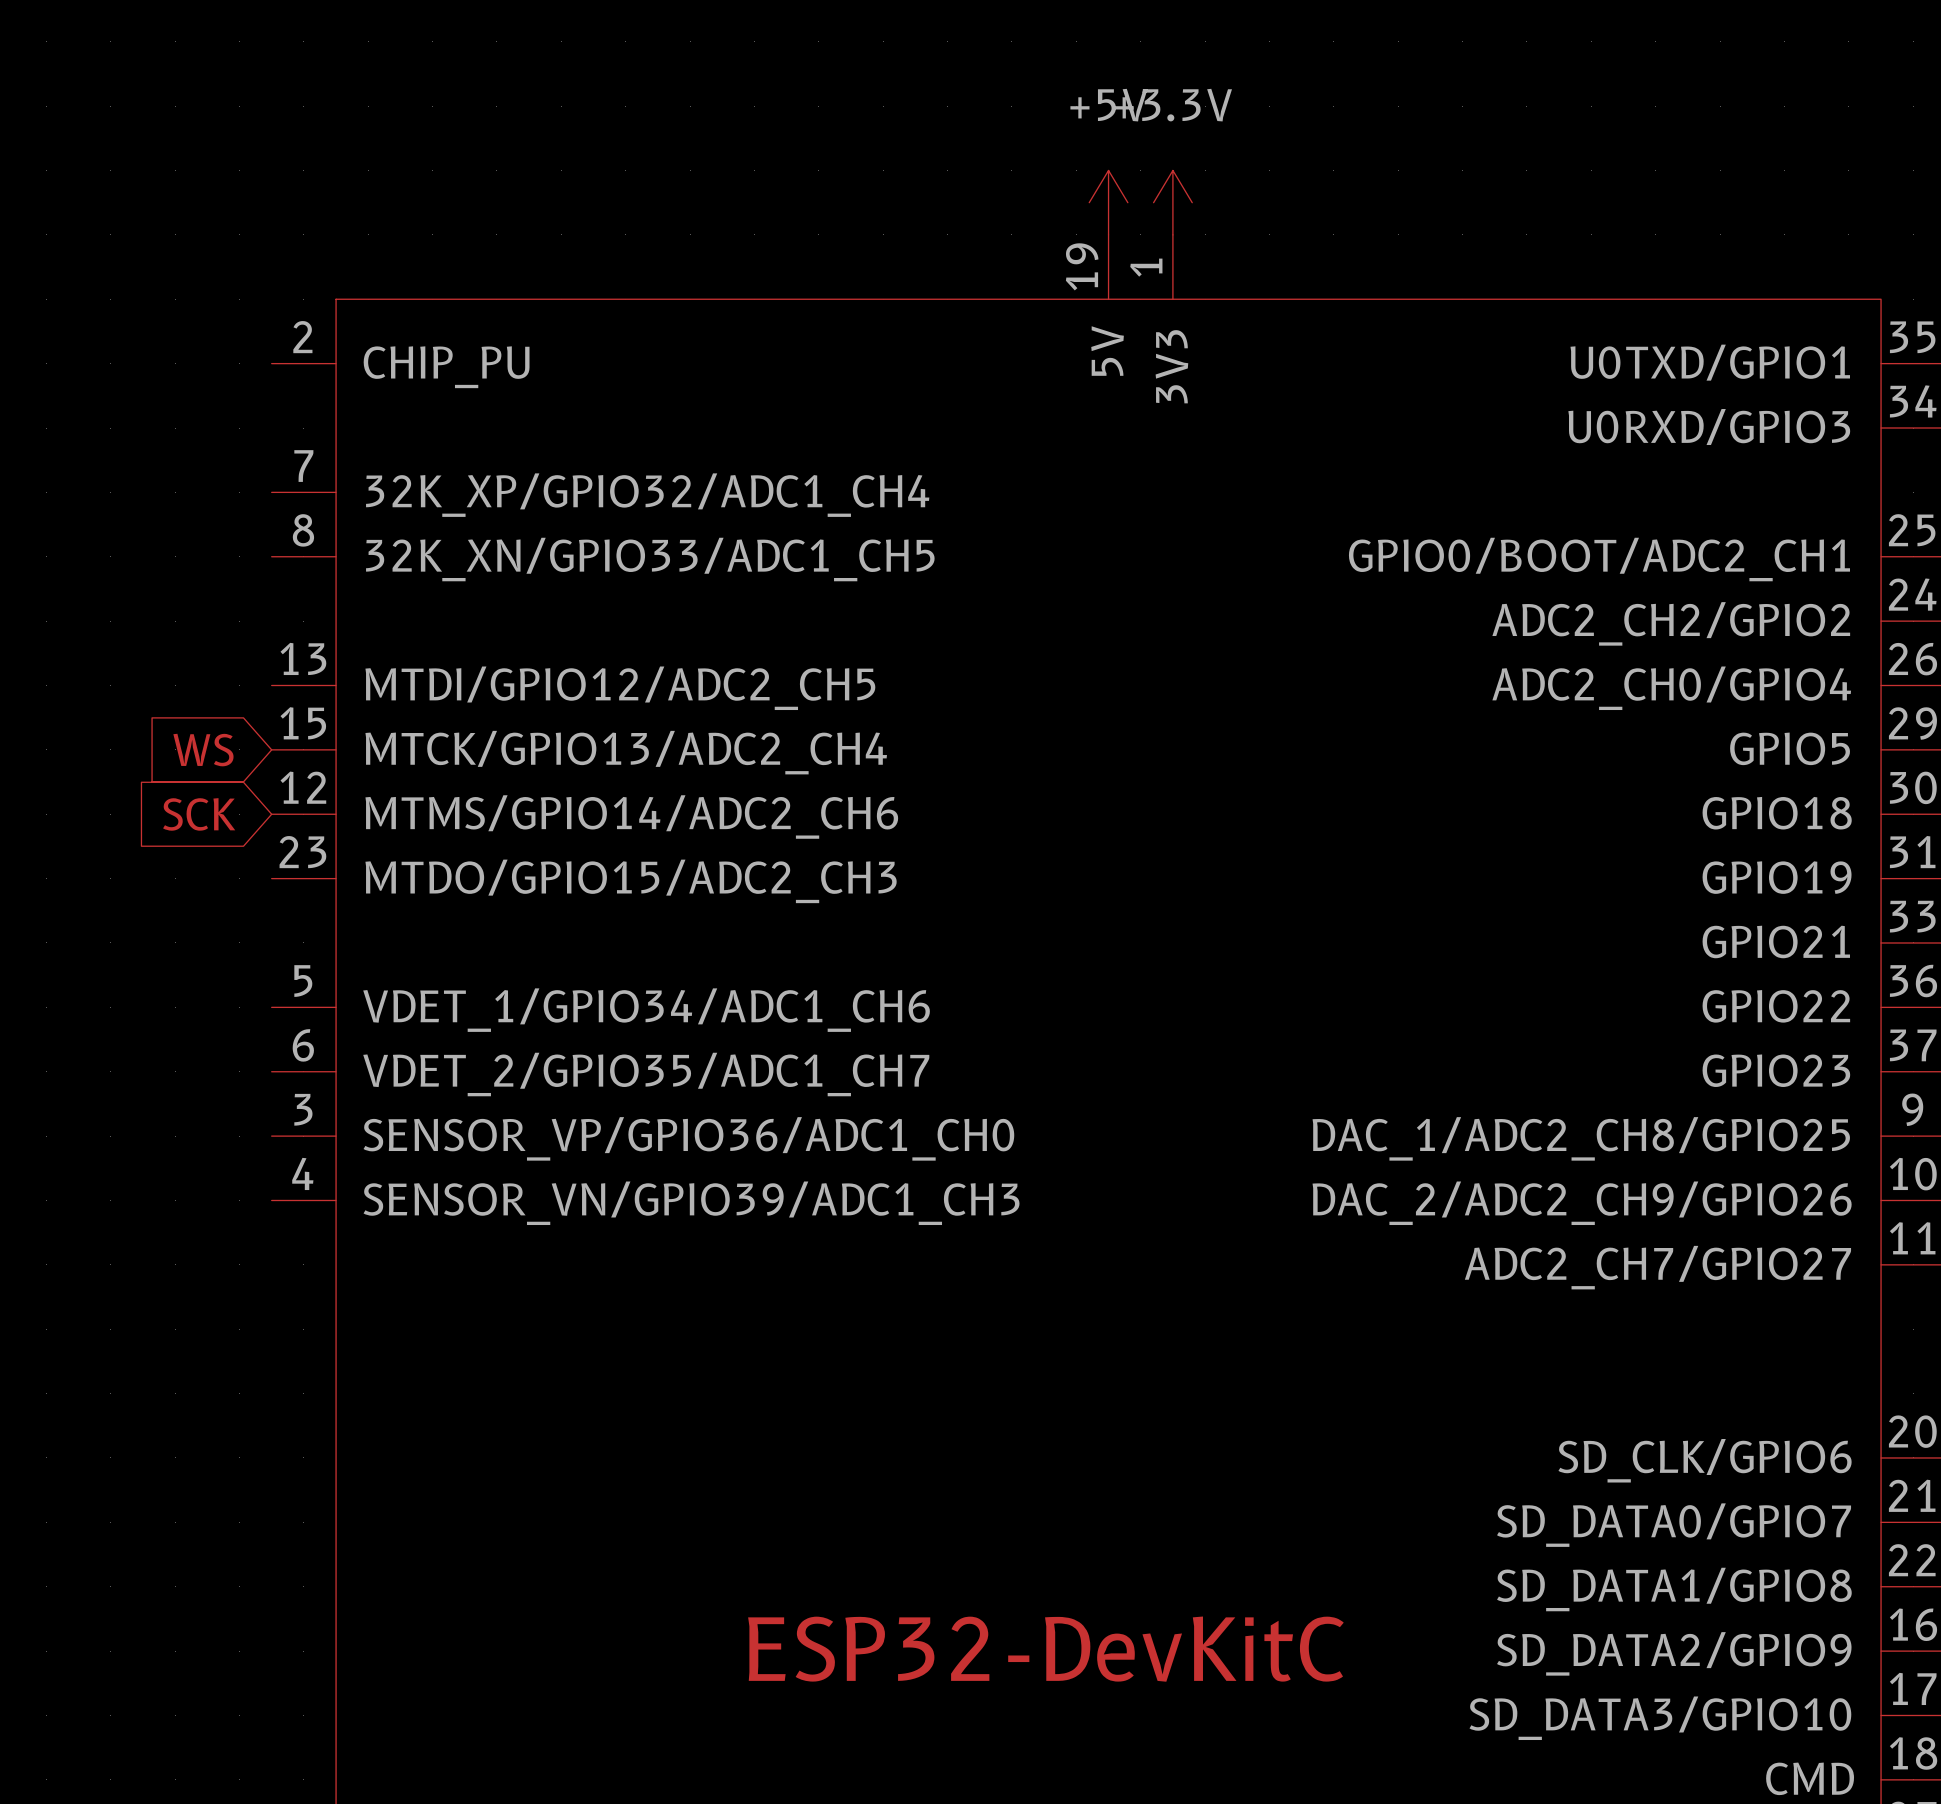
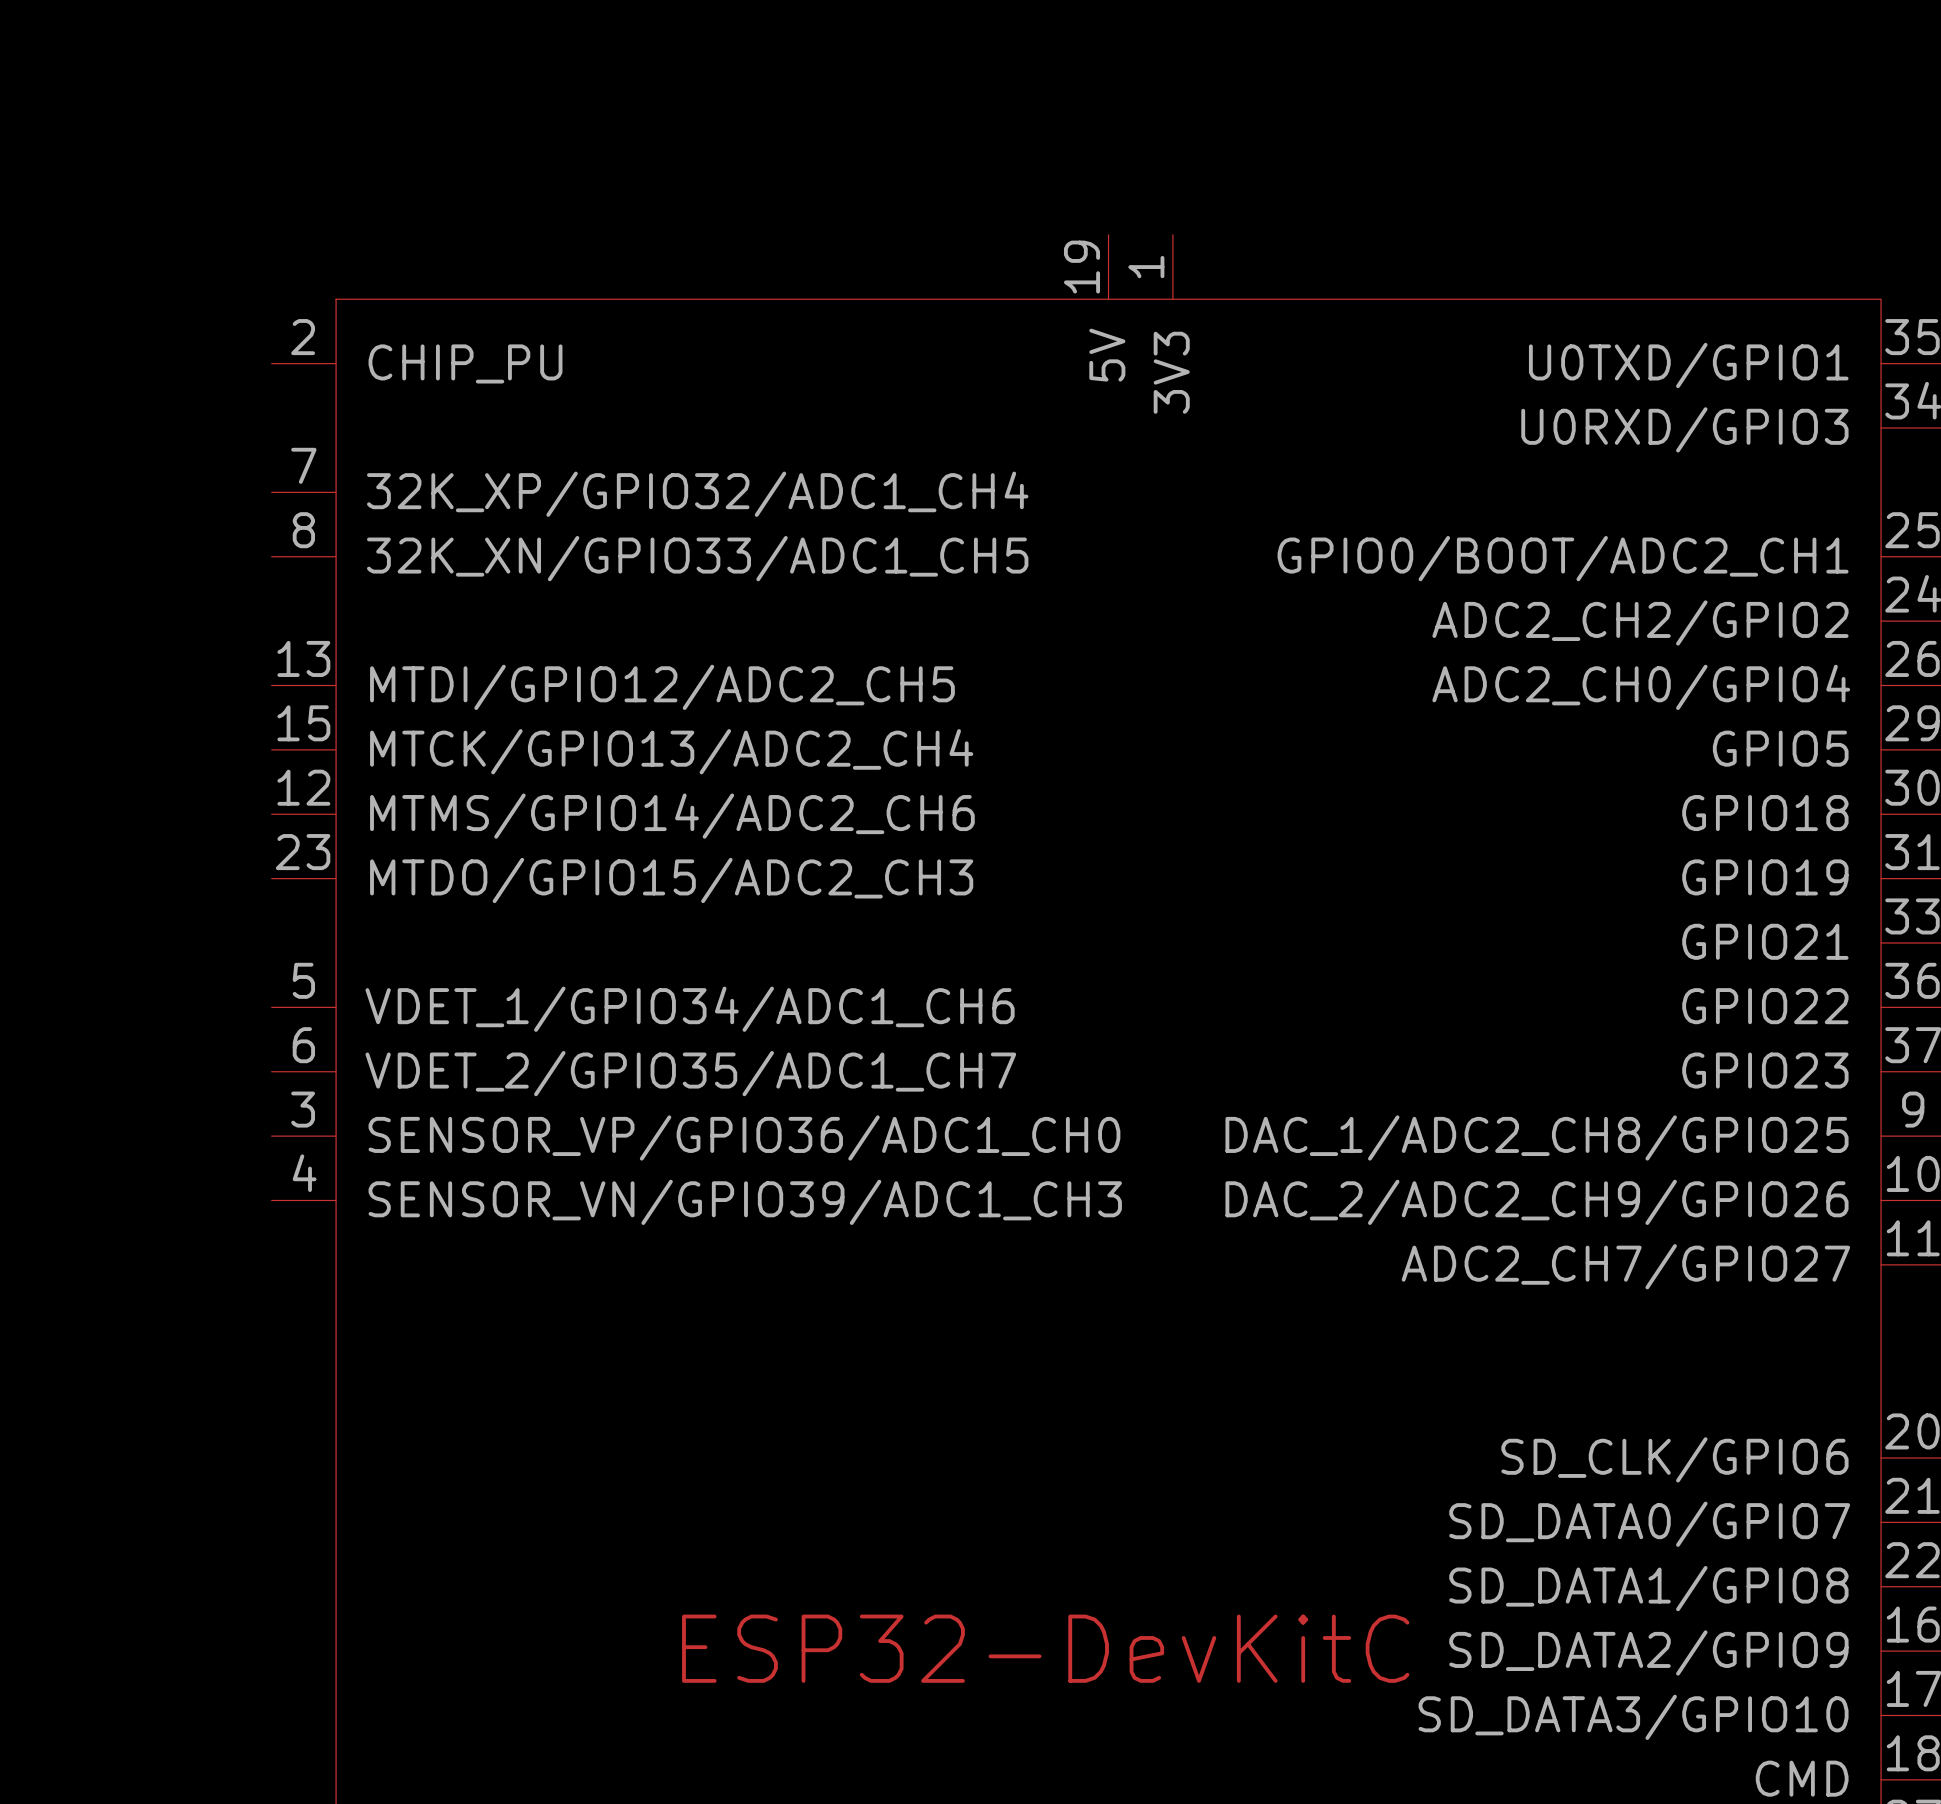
power symbol: +5V (1108, 202) -> none
power symbol: +3.3V (1172, 202) -> none
global label: WS (203, 750) -> none
global label: SCK (199, 814) -> none

